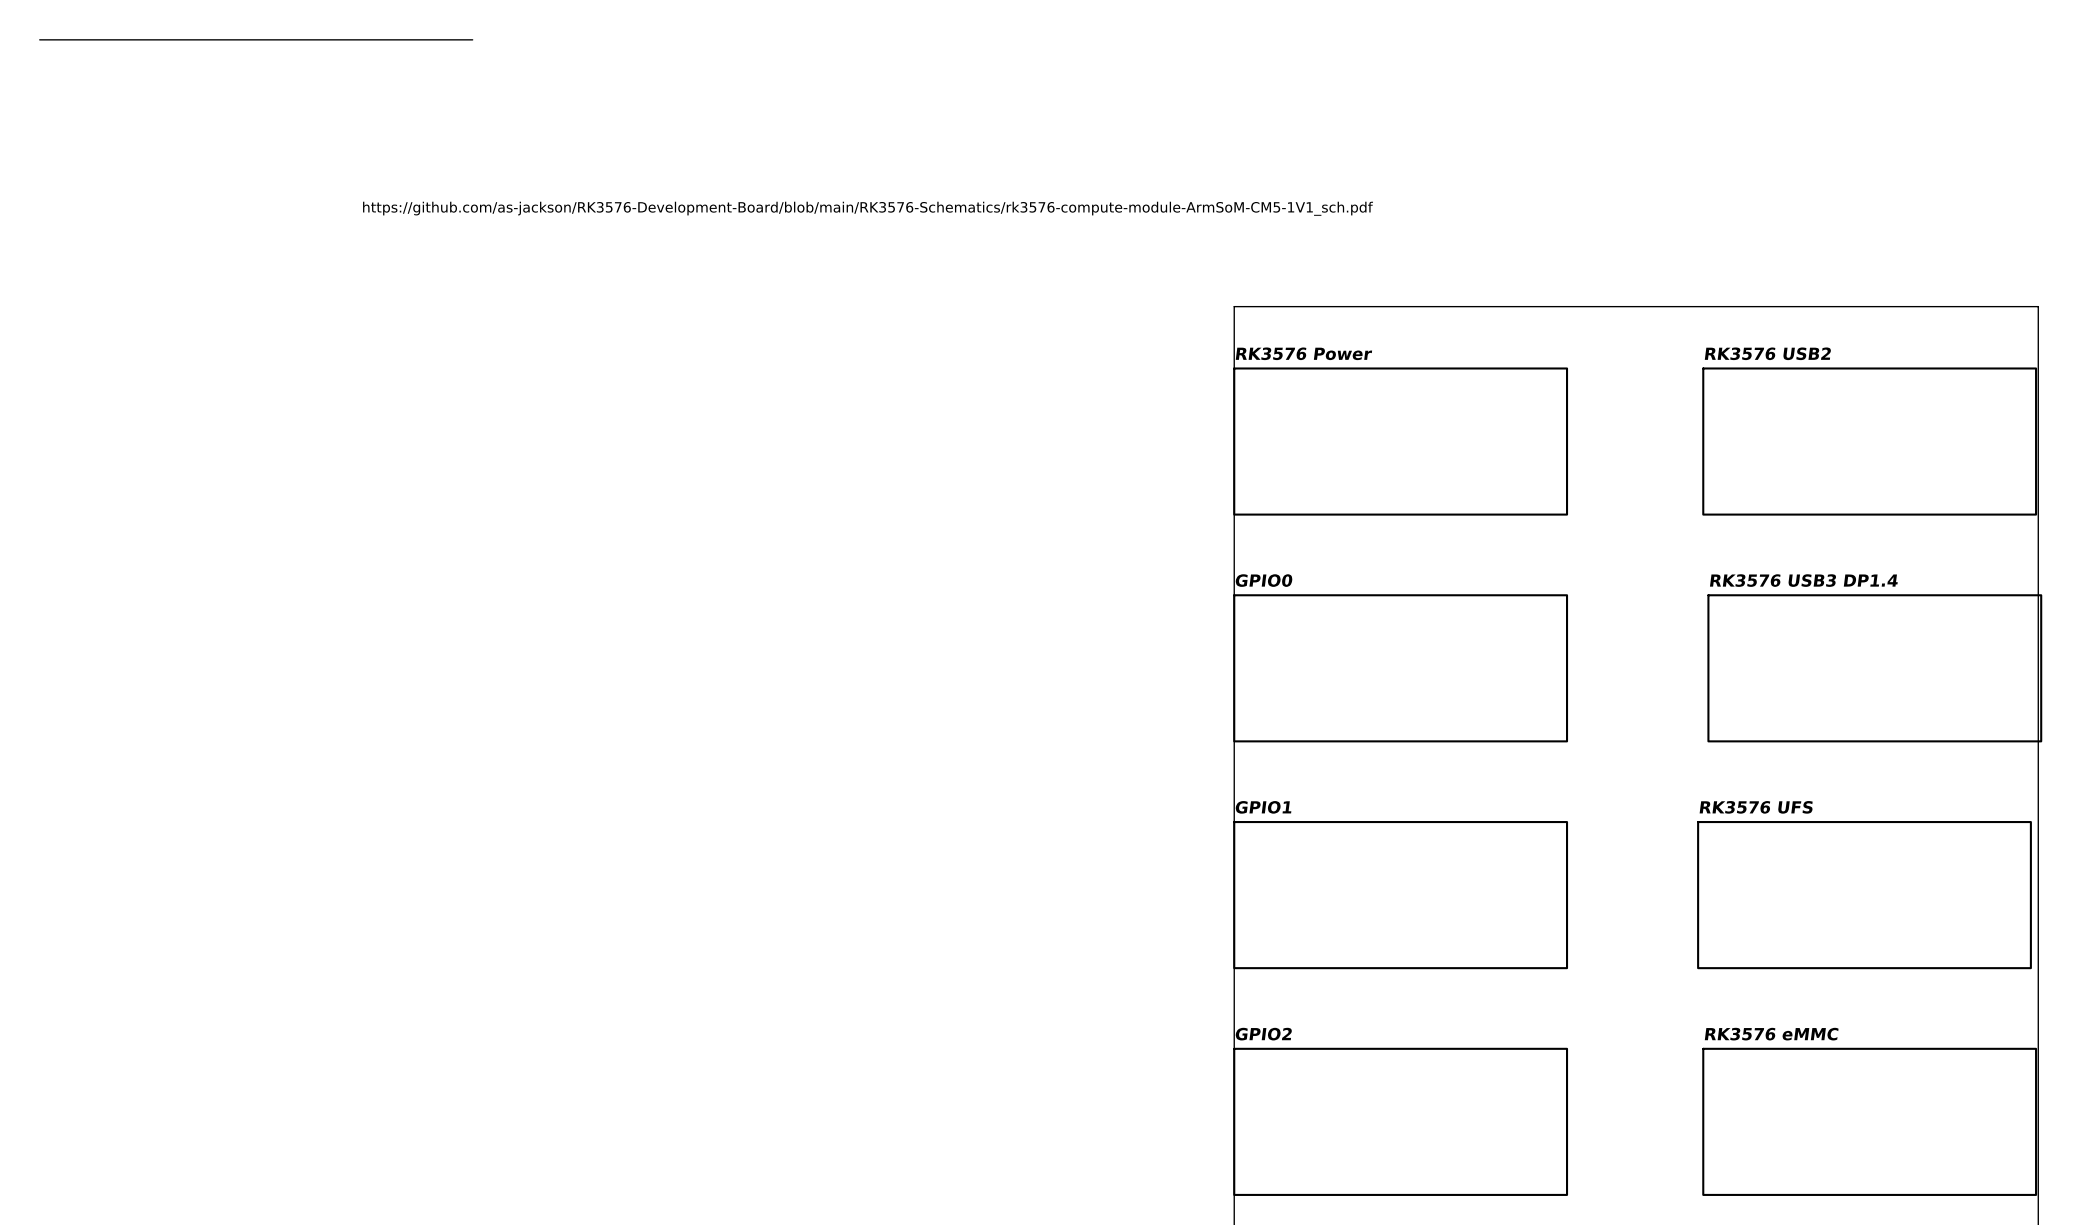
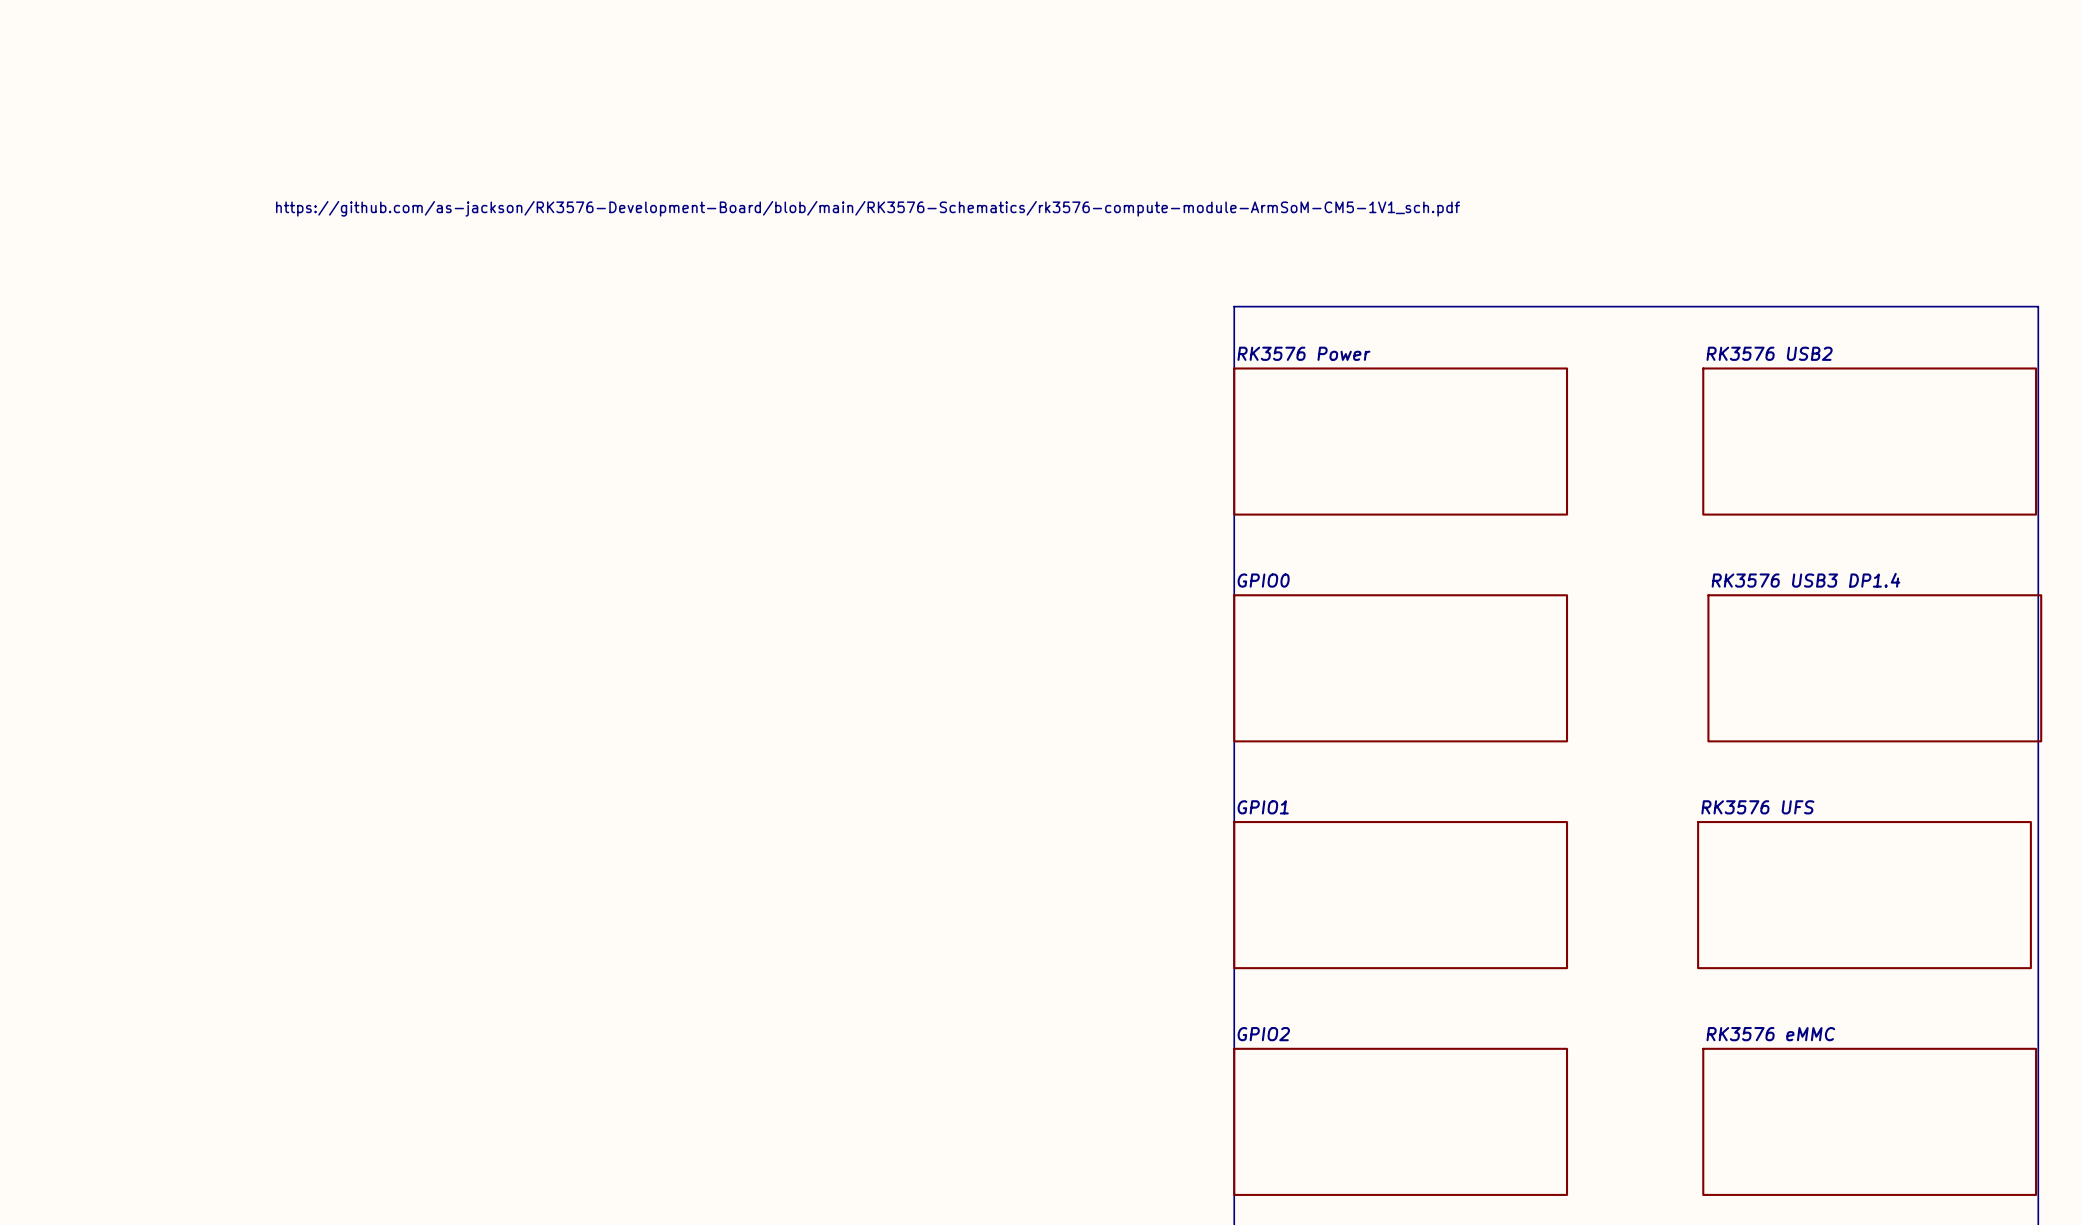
bus: (39, 39) (472, 39) -> none

